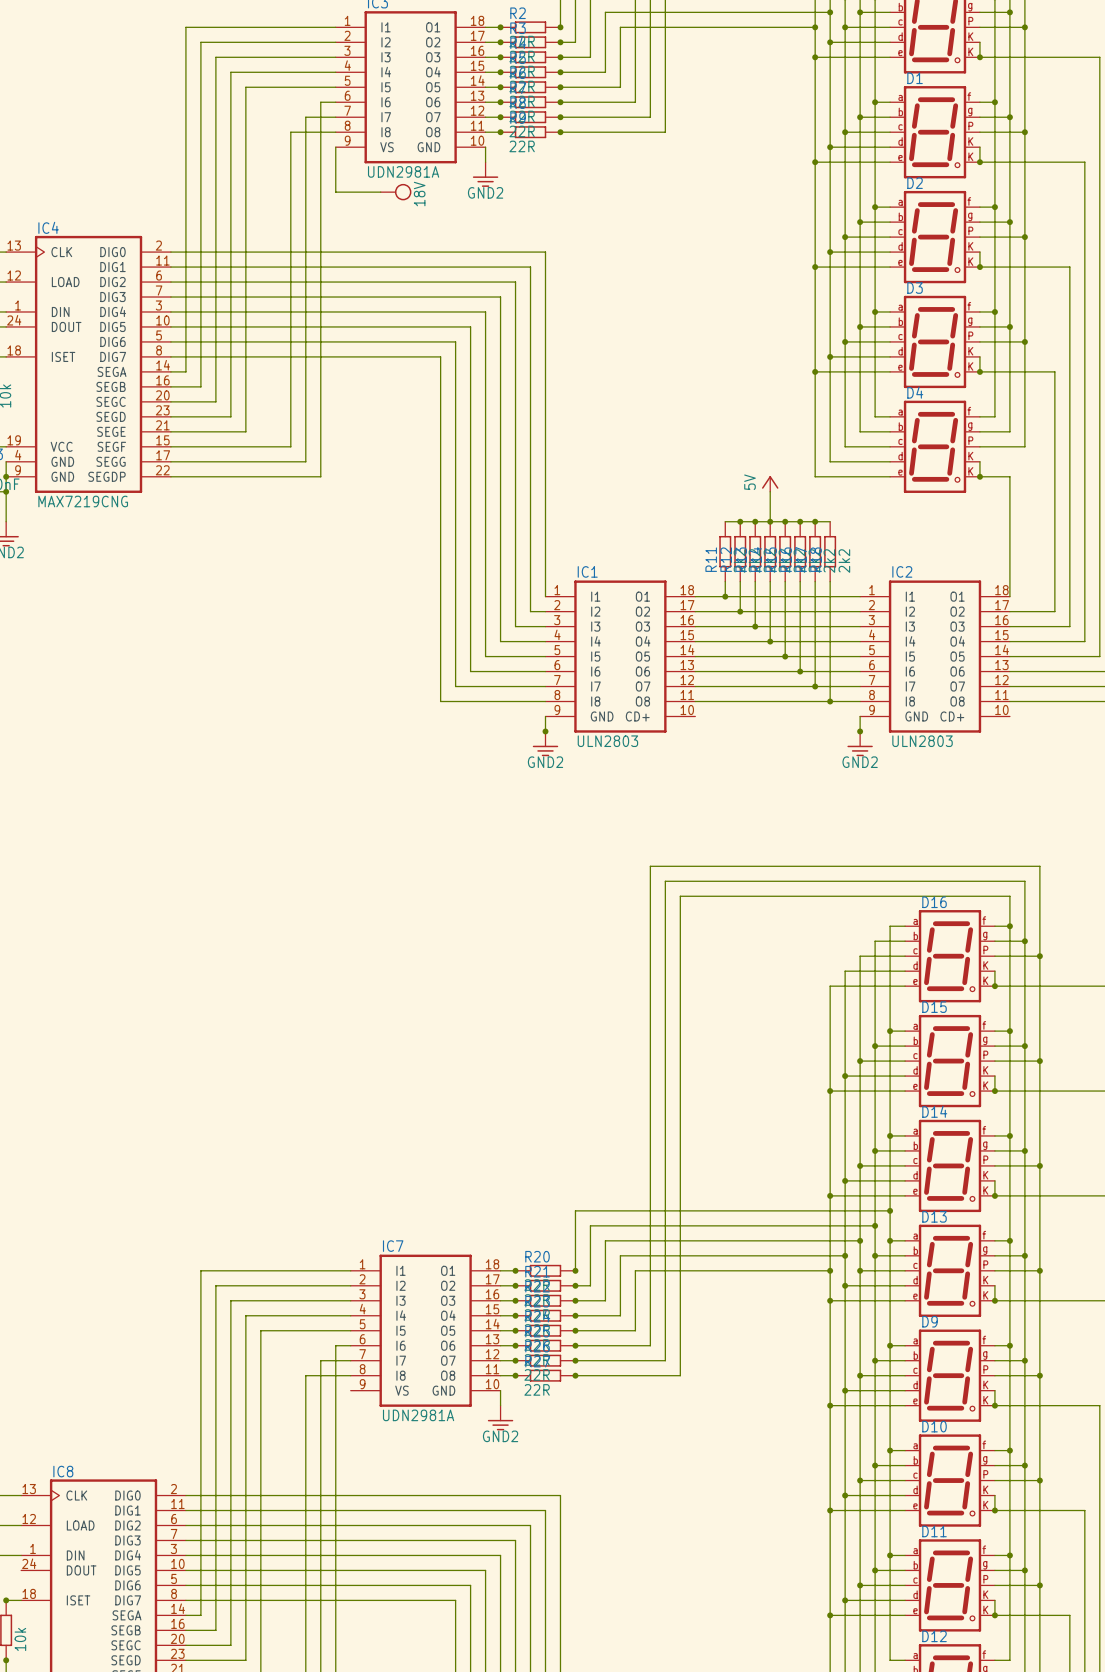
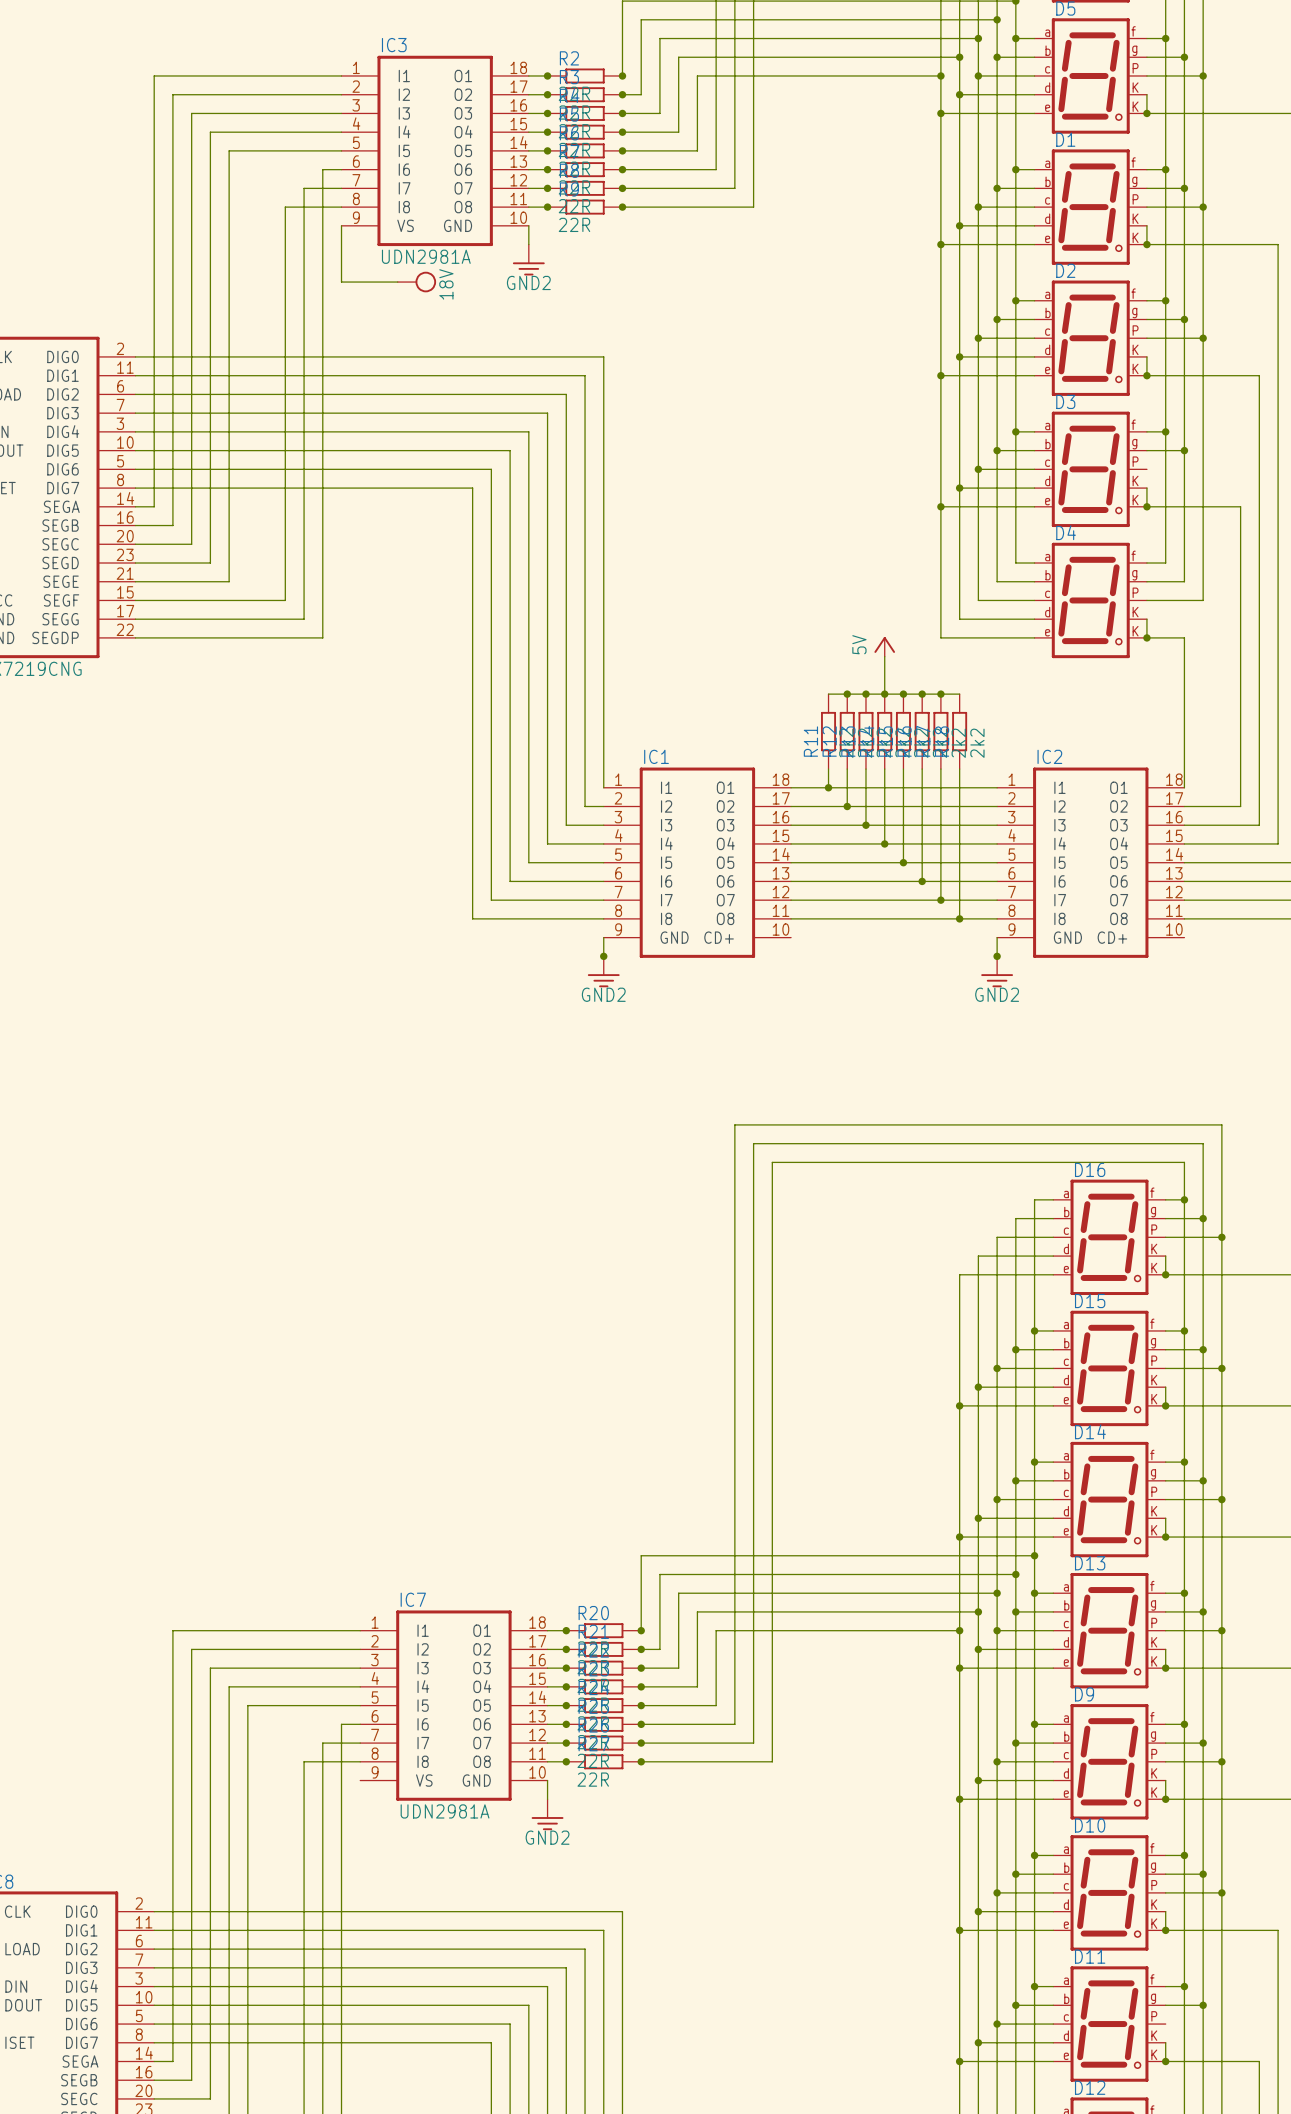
wire: (979, 341) (1024, 341) -> none
junction: (1024, 341) -> none
IC1 value: ULN2803 (607, 741) -> none
IC2 value: ULN2803 (922, 741) -> none
wire: (994, 1585) (1039, 1585) -> none
junction: (1039, 1585) -> none

